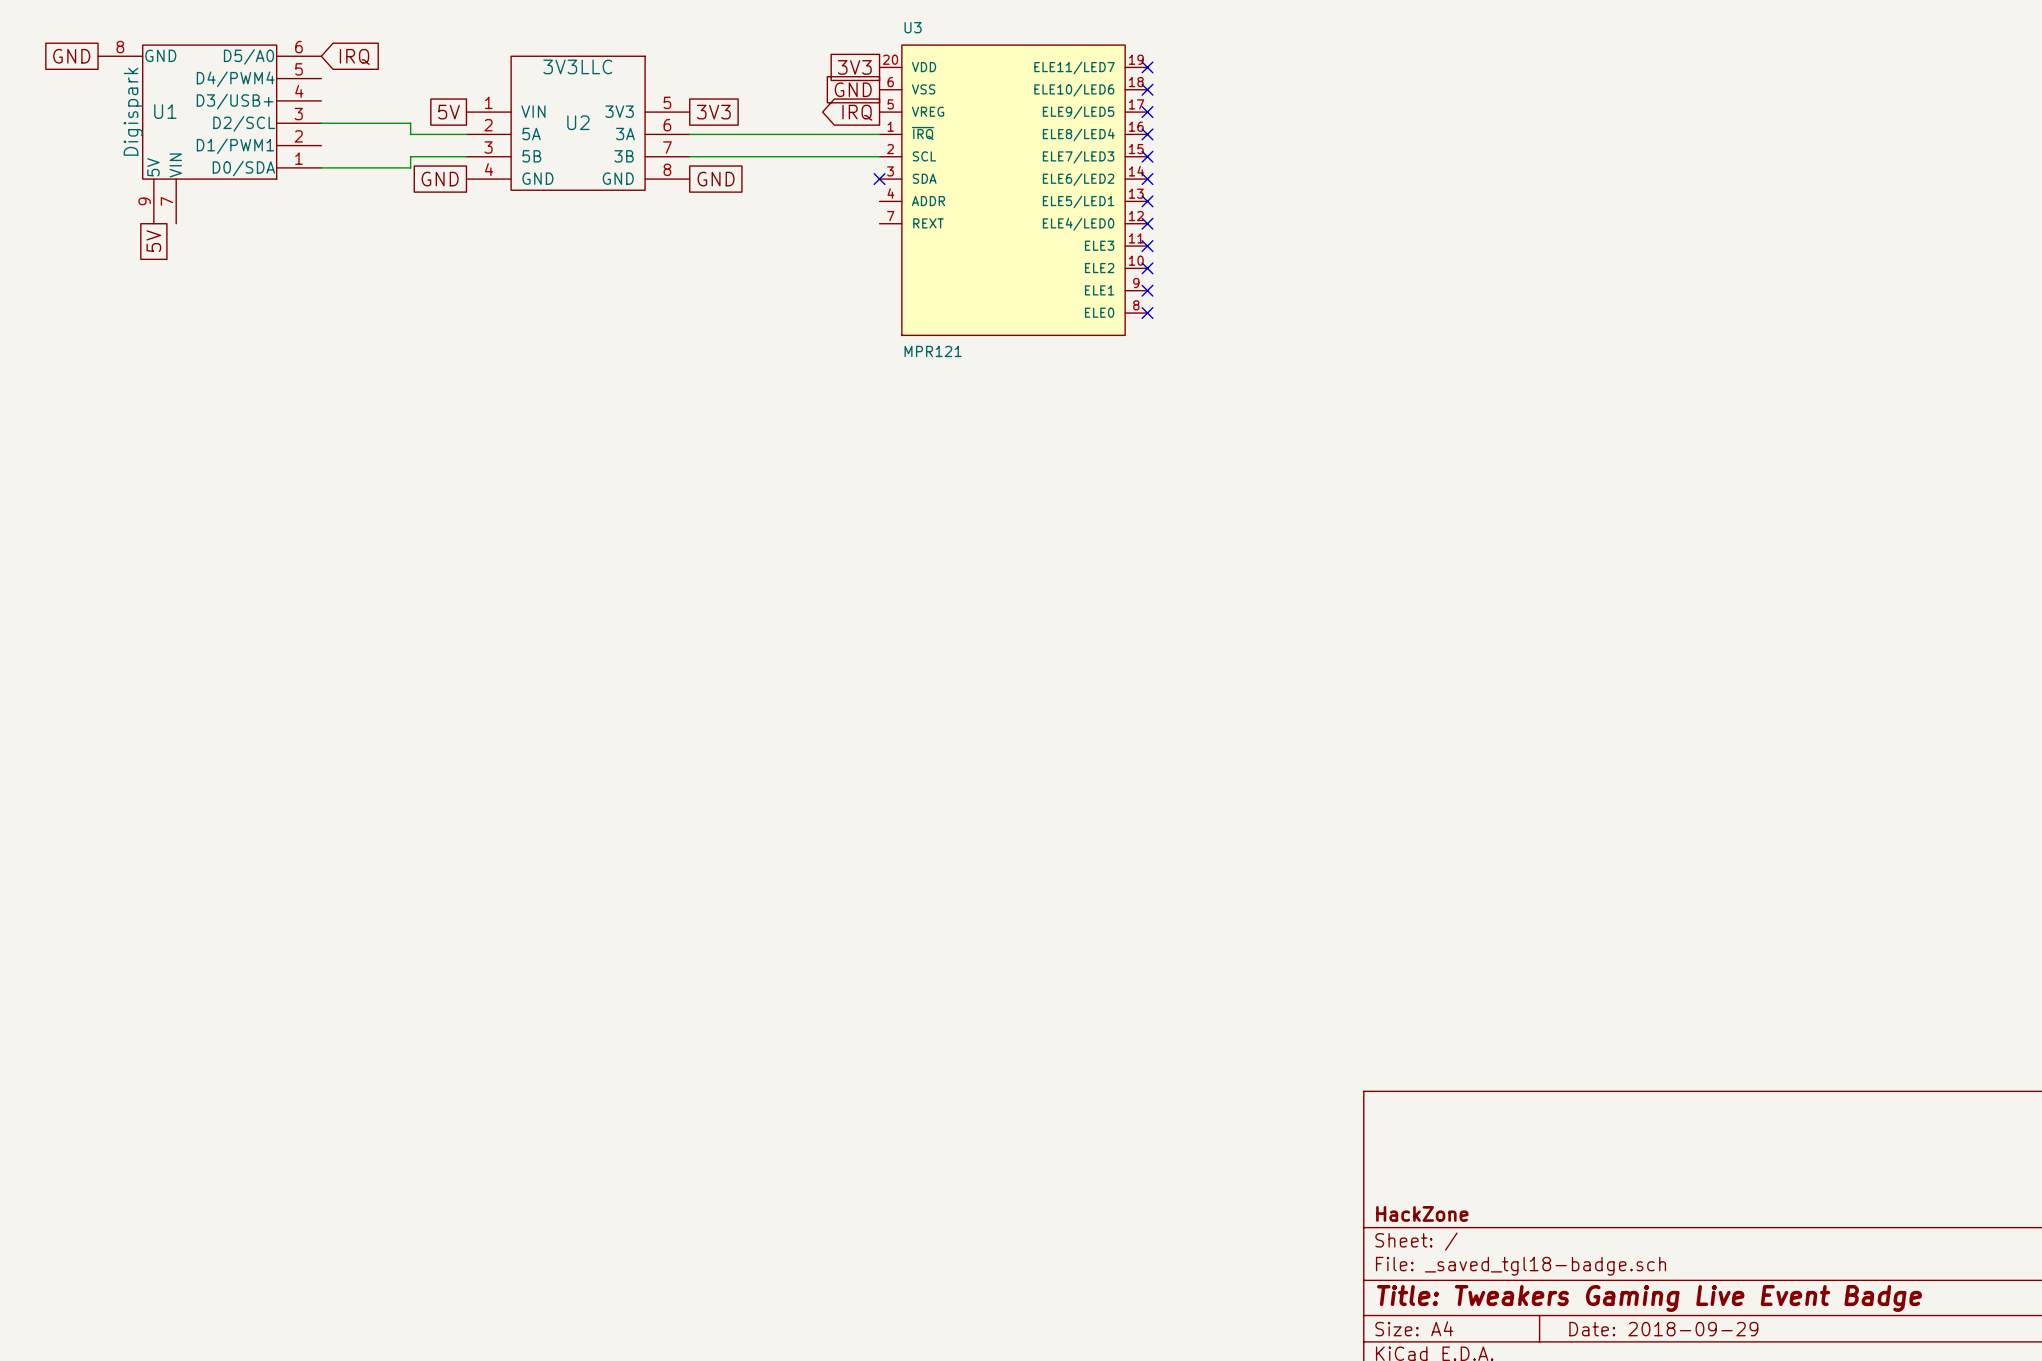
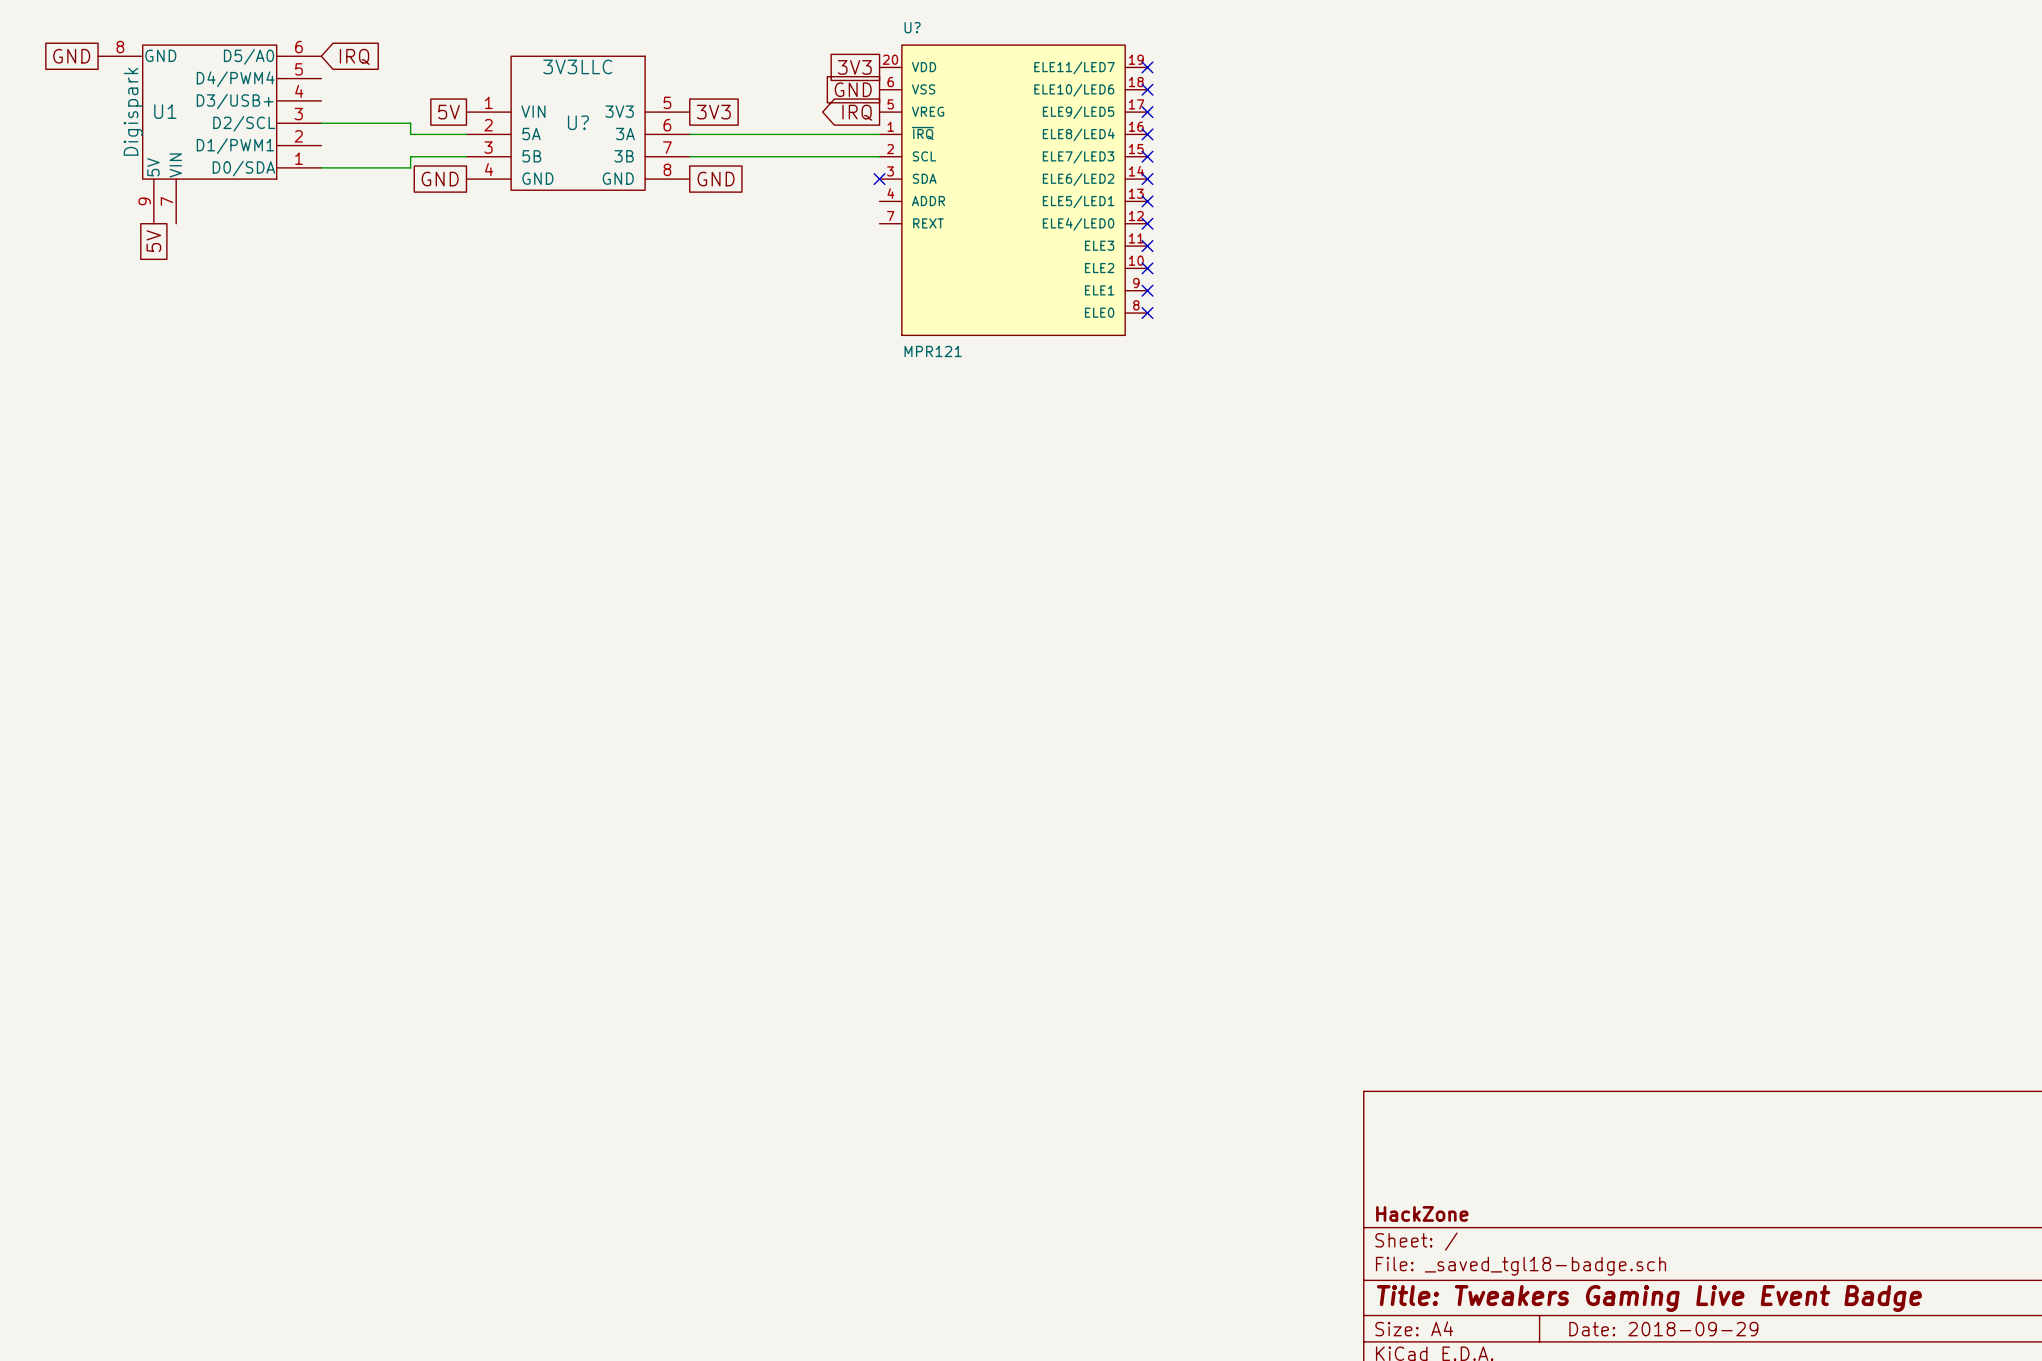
U3 name: U3 (913, 27) -> U? (912, 27)
U2 name: U2 (578, 122) -> U? (578, 122)

